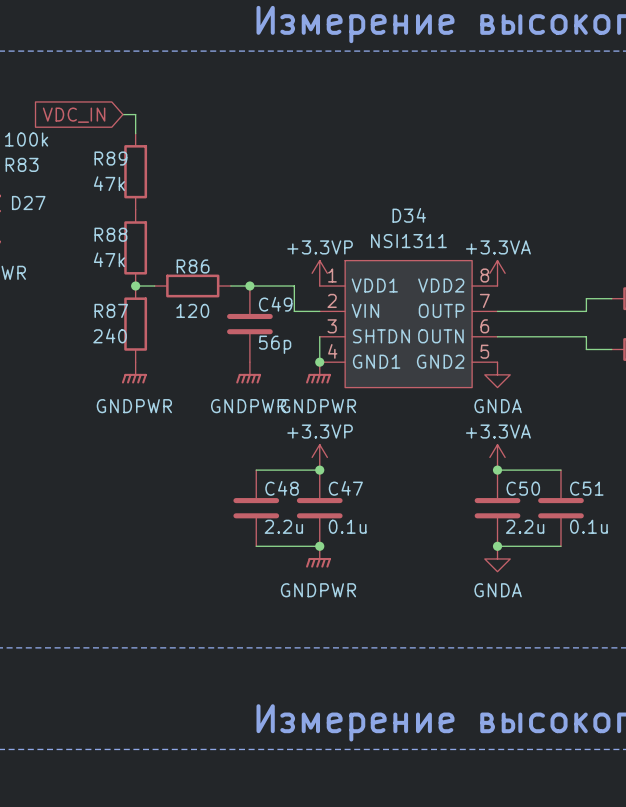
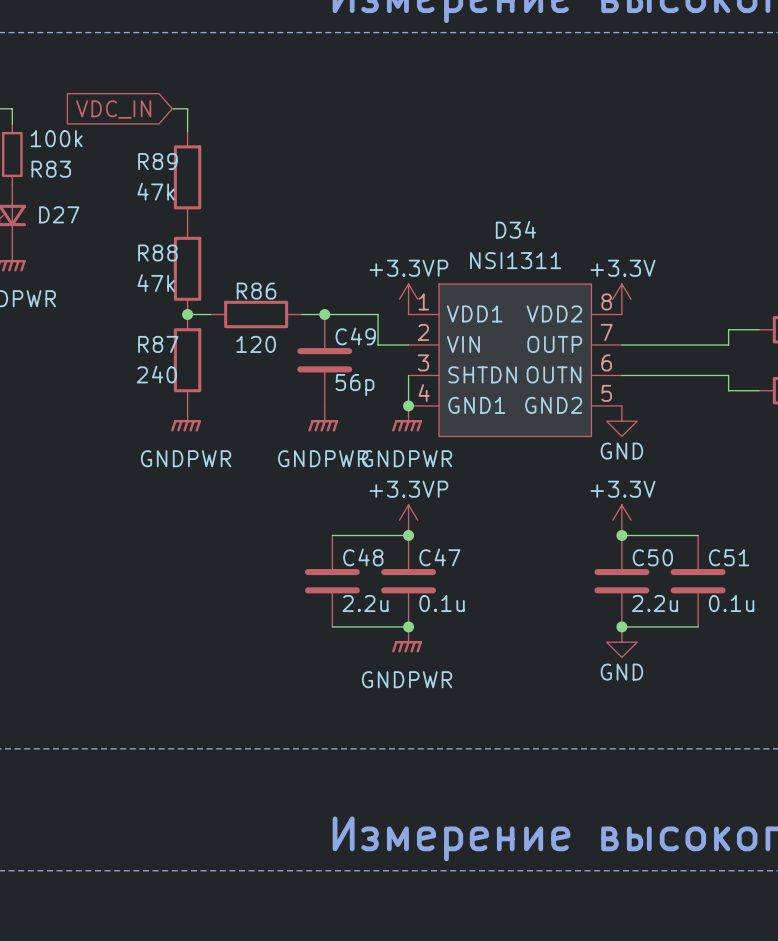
power symbol: +3.3VA (497, 273) -> +3.3V (621, 299)
power symbol: GNDA (497, 374) -> GND (621, 421)
power symbol: +3.3VA (497, 457) -> +3.3V (621, 520)
power symbol: GNDA (497, 558) -> GND (621, 642)

